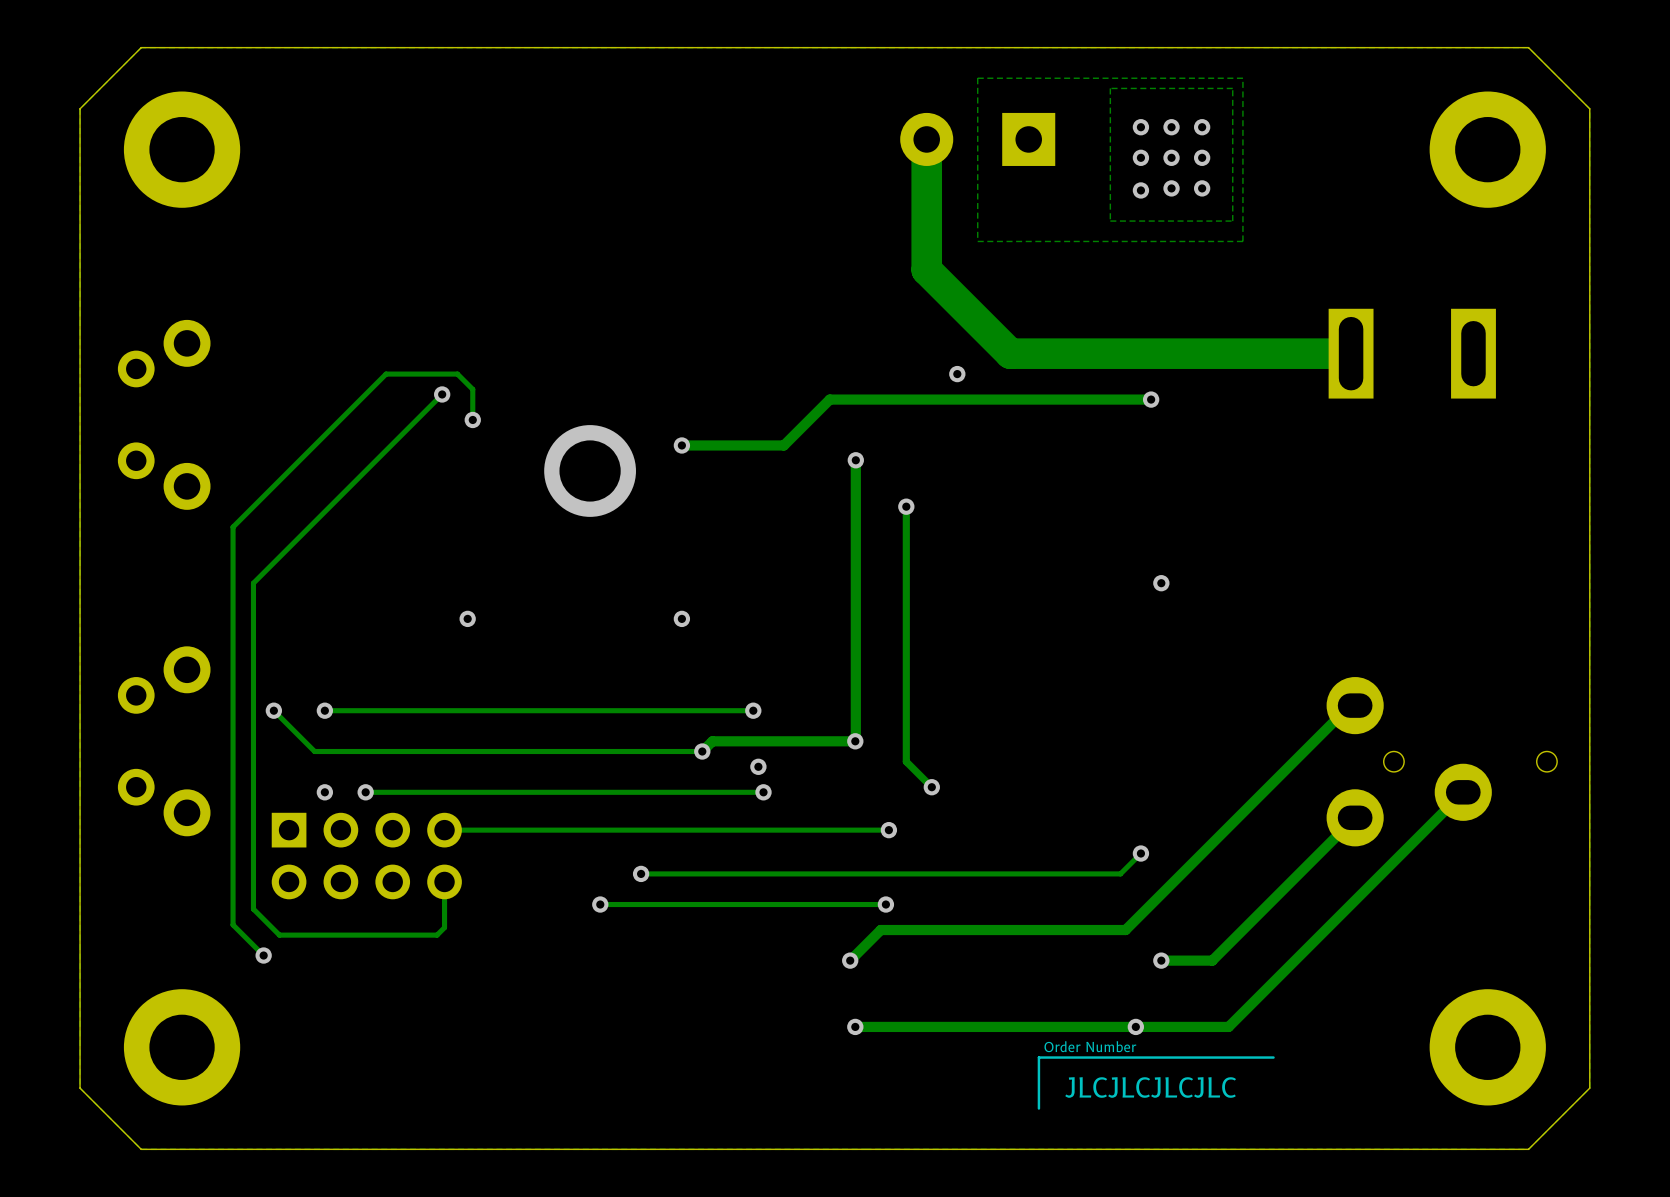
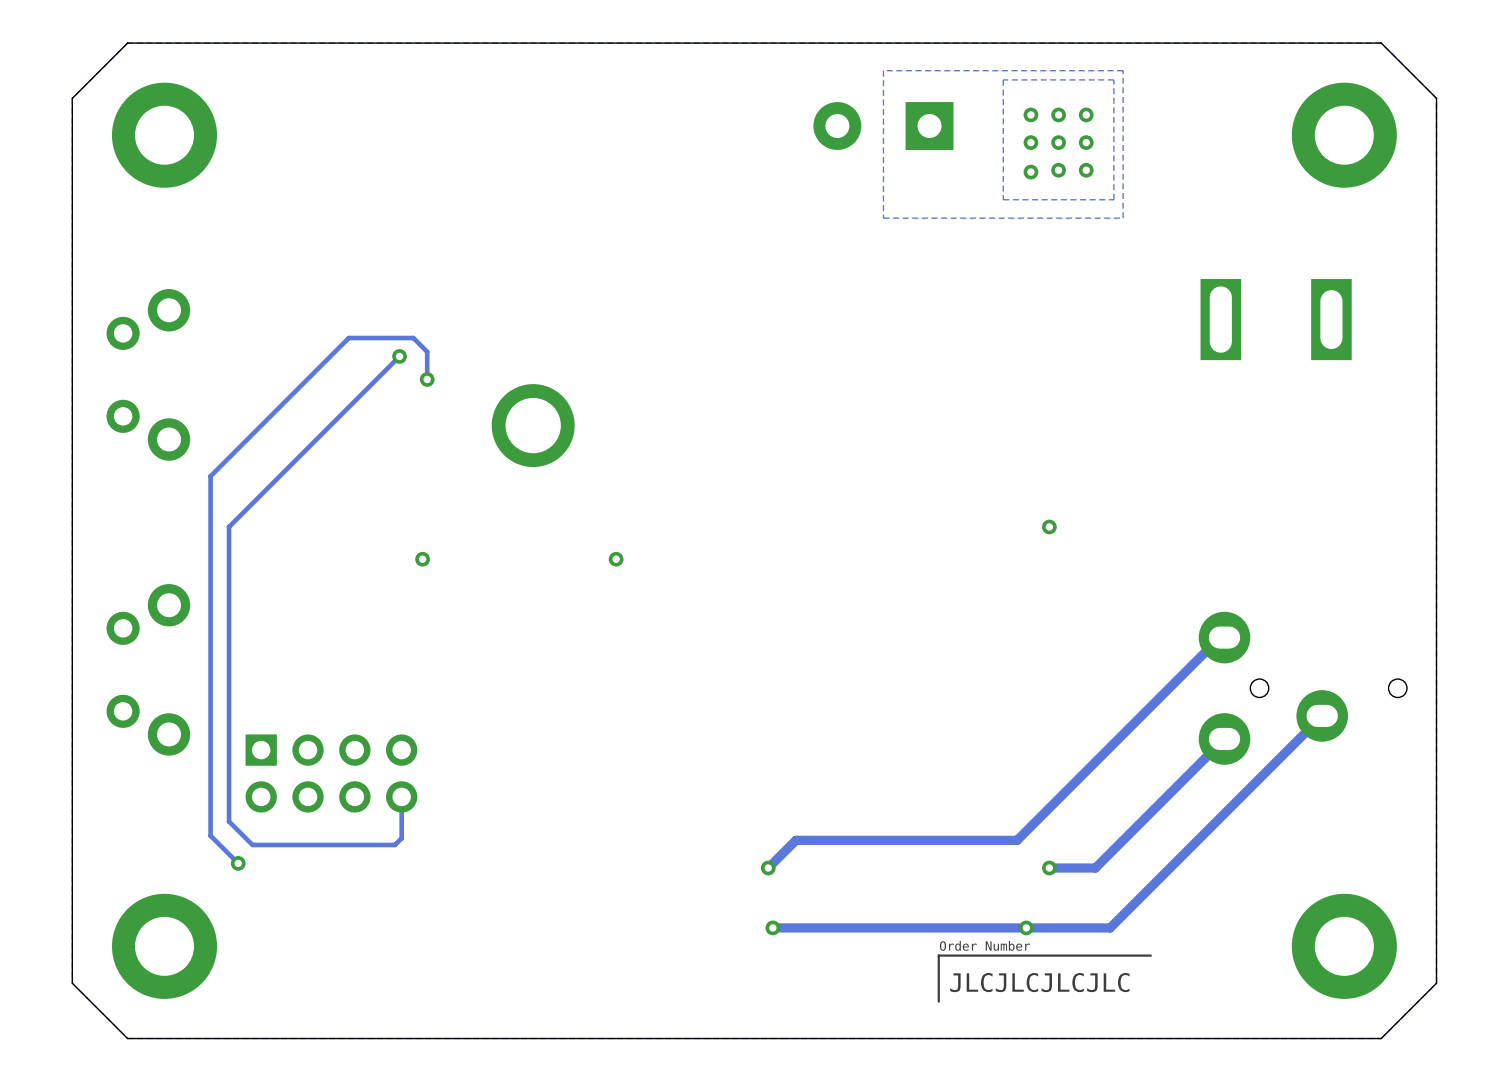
track: (926, 139) (926, 270) (1010, 353) (1351, 353) -> none
via: (957, 374) -> none
track: (1151, 399) (829, 399) (783, 445) (681, 445) -> none
via: (1151, 399) -> none
via: (681, 445) -> none
track: (855, 460) (855, 741) (712, 741) (702, 751) (314, 751) (273, 710) -> none
via: (855, 460) -> none
track: (906, 506) (906, 761) (931, 787) -> none
via: (906, 506) -> none
via: (273, 710) -> none
via: (324, 710) -> none
track: (753, 710) (324, 710) -> none
via: (753, 710) -> none
via: (855, 741) -> none
via: (702, 751) -> none
via: (758, 766) -> none
via: (931, 787) -> none
via: (324, 792) -> none
via: (365, 792) -> none
track: (763, 792) (365, 792) -> none
via: (763, 792) -> none
track: (888, 830) (444, 830) -> none
via: (888, 830) -> none
track: (1140, 853) (1120, 873) (641, 873) -> none
via: (1140, 853) -> none
via: (641, 873) -> none
via: (600, 904) -> none
track: (885, 904) (600, 904) -> none
via: (885, 904) -> none

